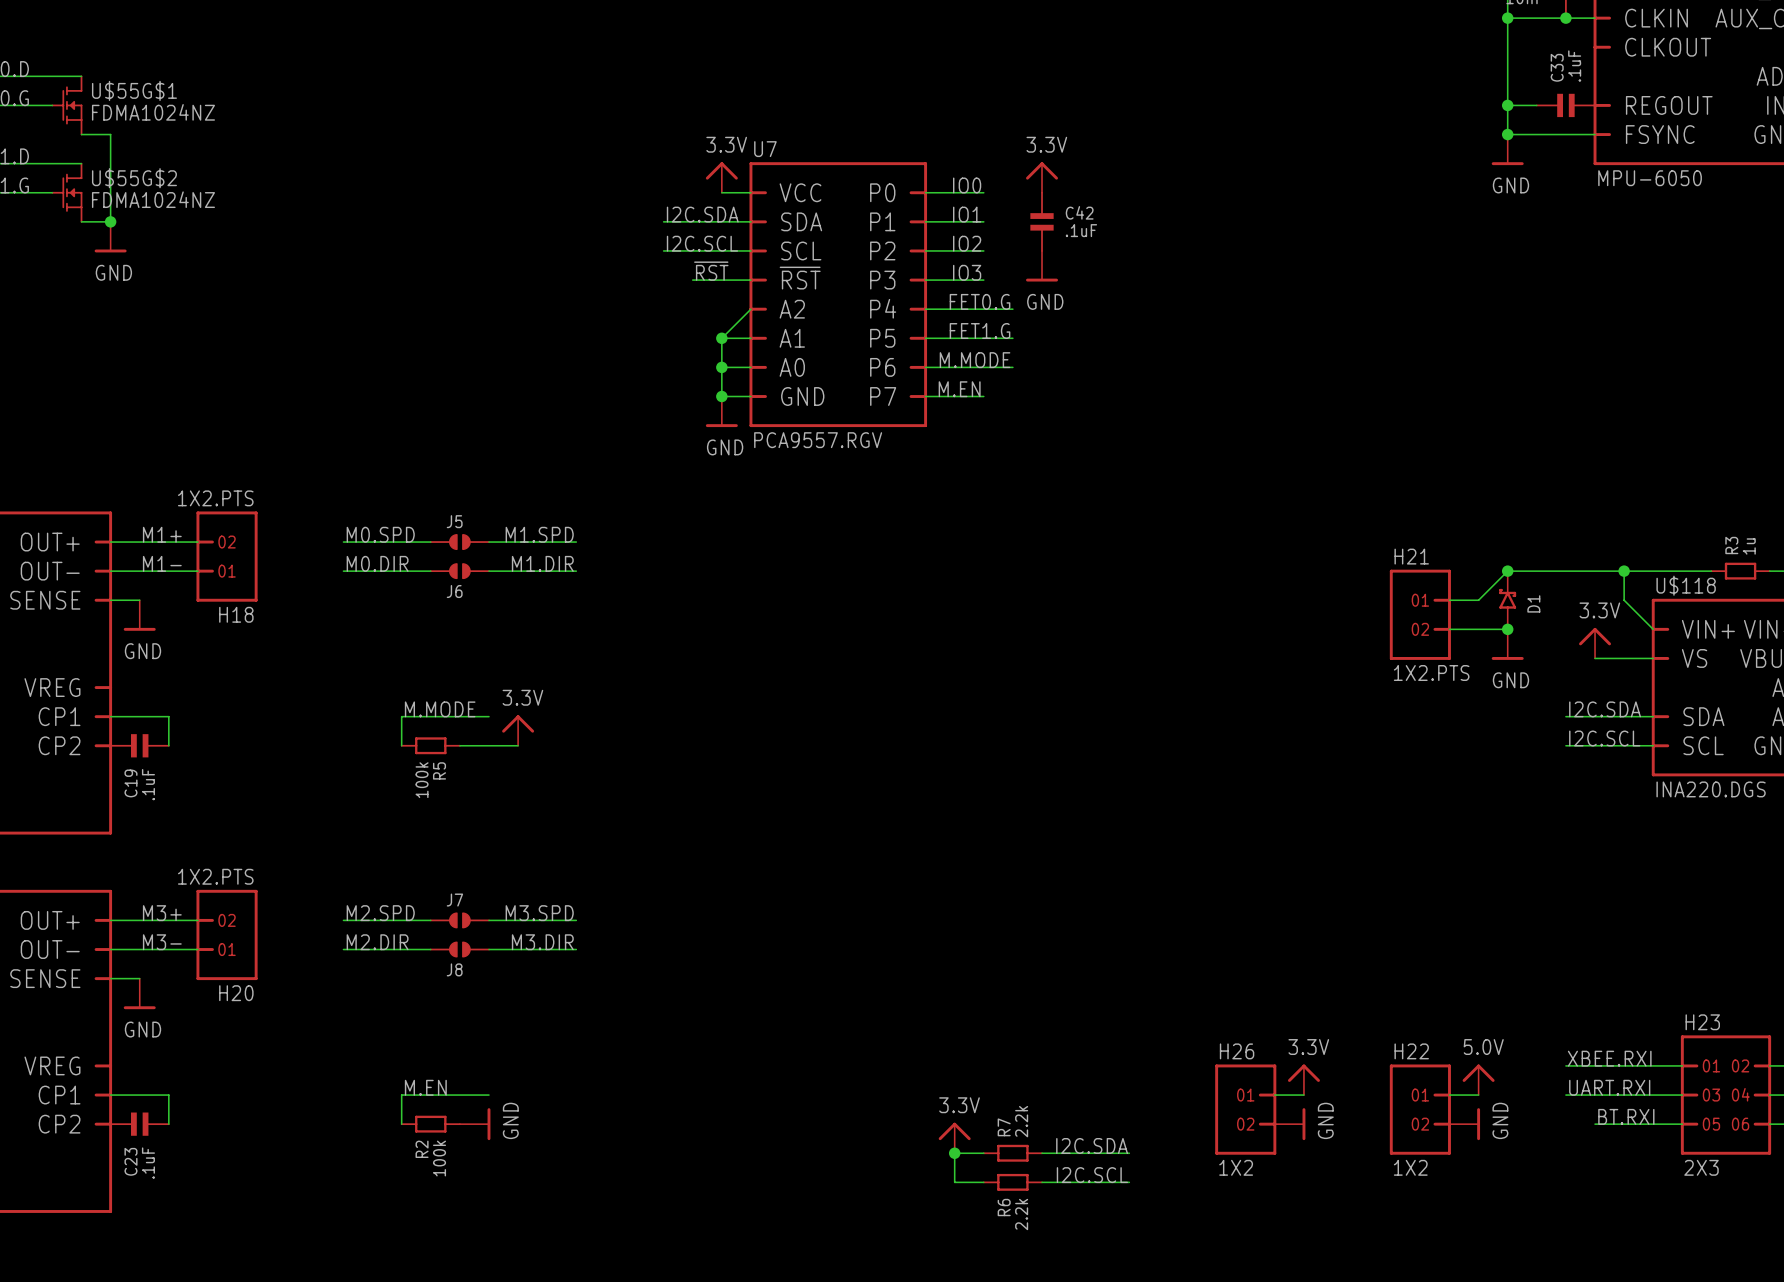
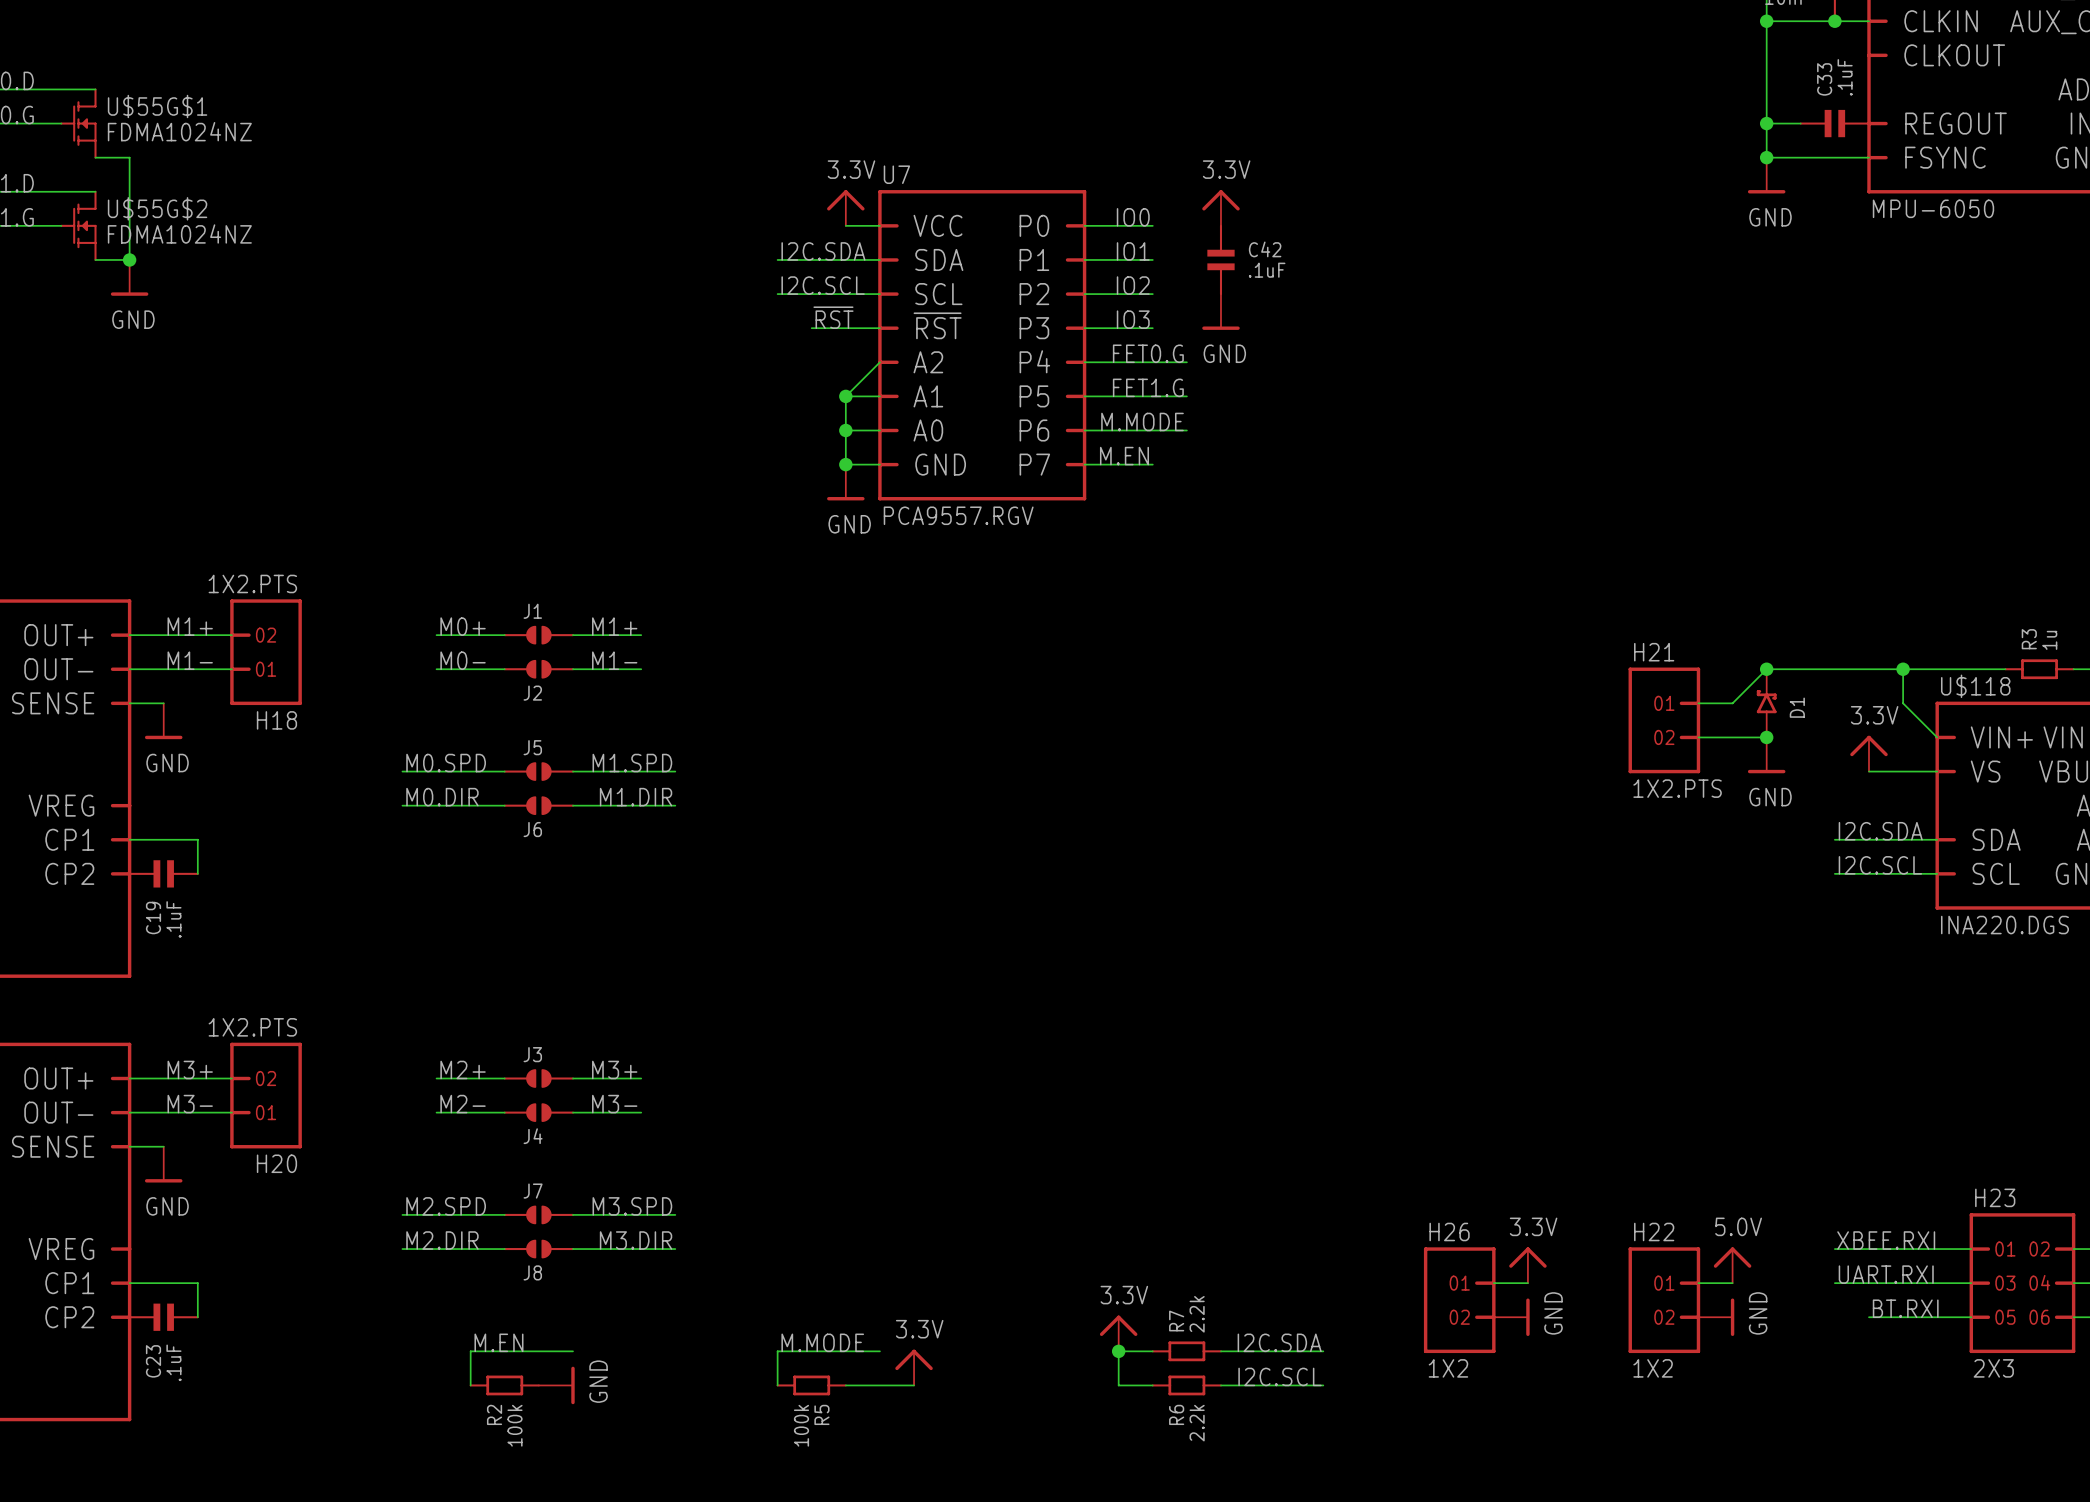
J5 name: J5 (454, 521) -> J1 (532, 611)
label position: M0.SPD (380, 534) -> M0.SPD (446, 763)
label: none -> M0+ (463, 626)
label: none -> M1+ (614, 626)
label position: M1.SPD (539, 534) -> M1.SPD (632, 763)
wire: (343, 542) (372, 542) -> none
wire: (547, 542) (576, 542) -> none
label position: M0.DIR (377, 563) -> M0.DIR (442, 797)
label: none -> M0- (463, 660)
label: none -> M1- (614, 660)
label position: M1.DIR (542, 563) -> M1.DIR (636, 797)
wire: (343, 571) (372, 571) -> none
wire: (547, 571) (576, 571) -> none
J6 name: J6 (454, 591) -> J2 (532, 693)
wire: none -> (402, 771) (504, 771)
J5: none -> (538, 771)
wire: none -> (572, 771) (675, 771)
wire: none -> (402, 805) (504, 805)
J6: none -> (538, 805)
wire: none -> (572, 805) (675, 805)
label: M.MODE (440, 709) -> none
wire: (488, 716) (401, 716) (401, 745) -> none
power symbol: 3.3V (518, 730) -> none
R5 position: (430, 745) -> (811, 1385)
wire: (459, 745) (518, 745) -> none
J7 name: J7 (454, 900) -> J3 (532, 1054)
label position: M2.SPD (380, 913) -> M2.SPD (446, 1206)
label: none -> M2+ (463, 1069)
label: none -> M3+ (614, 1069)
label position: M3.SPD (539, 913) -> M3.SPD (632, 1206)
wire: (343, 920) (372, 920) -> none
wire: (547, 920) (576, 920) -> none
label position: M2.DIR (377, 942) -> M2.DIR (442, 1240)
label: none -> M2- (463, 1104)
label: none -> M3- (614, 1104)
label position: M3.DIR (542, 942) -> M3.DIR (636, 1240)
wire: (343, 949) (372, 949) -> none
wire: (547, 949) (576, 949) -> none
J8 name: J8 (454, 969) -> J4 (533, 1136)
wire: none -> (402, 1214) (504, 1214)
J7: none -> (538, 1214)
wire: none -> (572, 1214) (675, 1214)
wire: none -> (402, 1249) (504, 1249)
J8: none -> (538, 1249)
wire: none -> (572, 1249) (675, 1249)
label position: M.EN (425, 1087) -> M.EN (498, 1342)
wire: (488, 1095) (401, 1095) (401, 1124) -> (572, 1351) (470, 1351) (470, 1385)
R2 position: (430, 1124) -> (504, 1385)
power symbol position: GND (475, 1124) -> GND (556, 1385)
label: none -> M.MODE (822, 1342)
wire: none -> (879, 1351) (777, 1351) (777, 1385)
power symbol: none -> 3.3V (914, 1367)
wire: none -> (845, 1385) (914, 1385)

